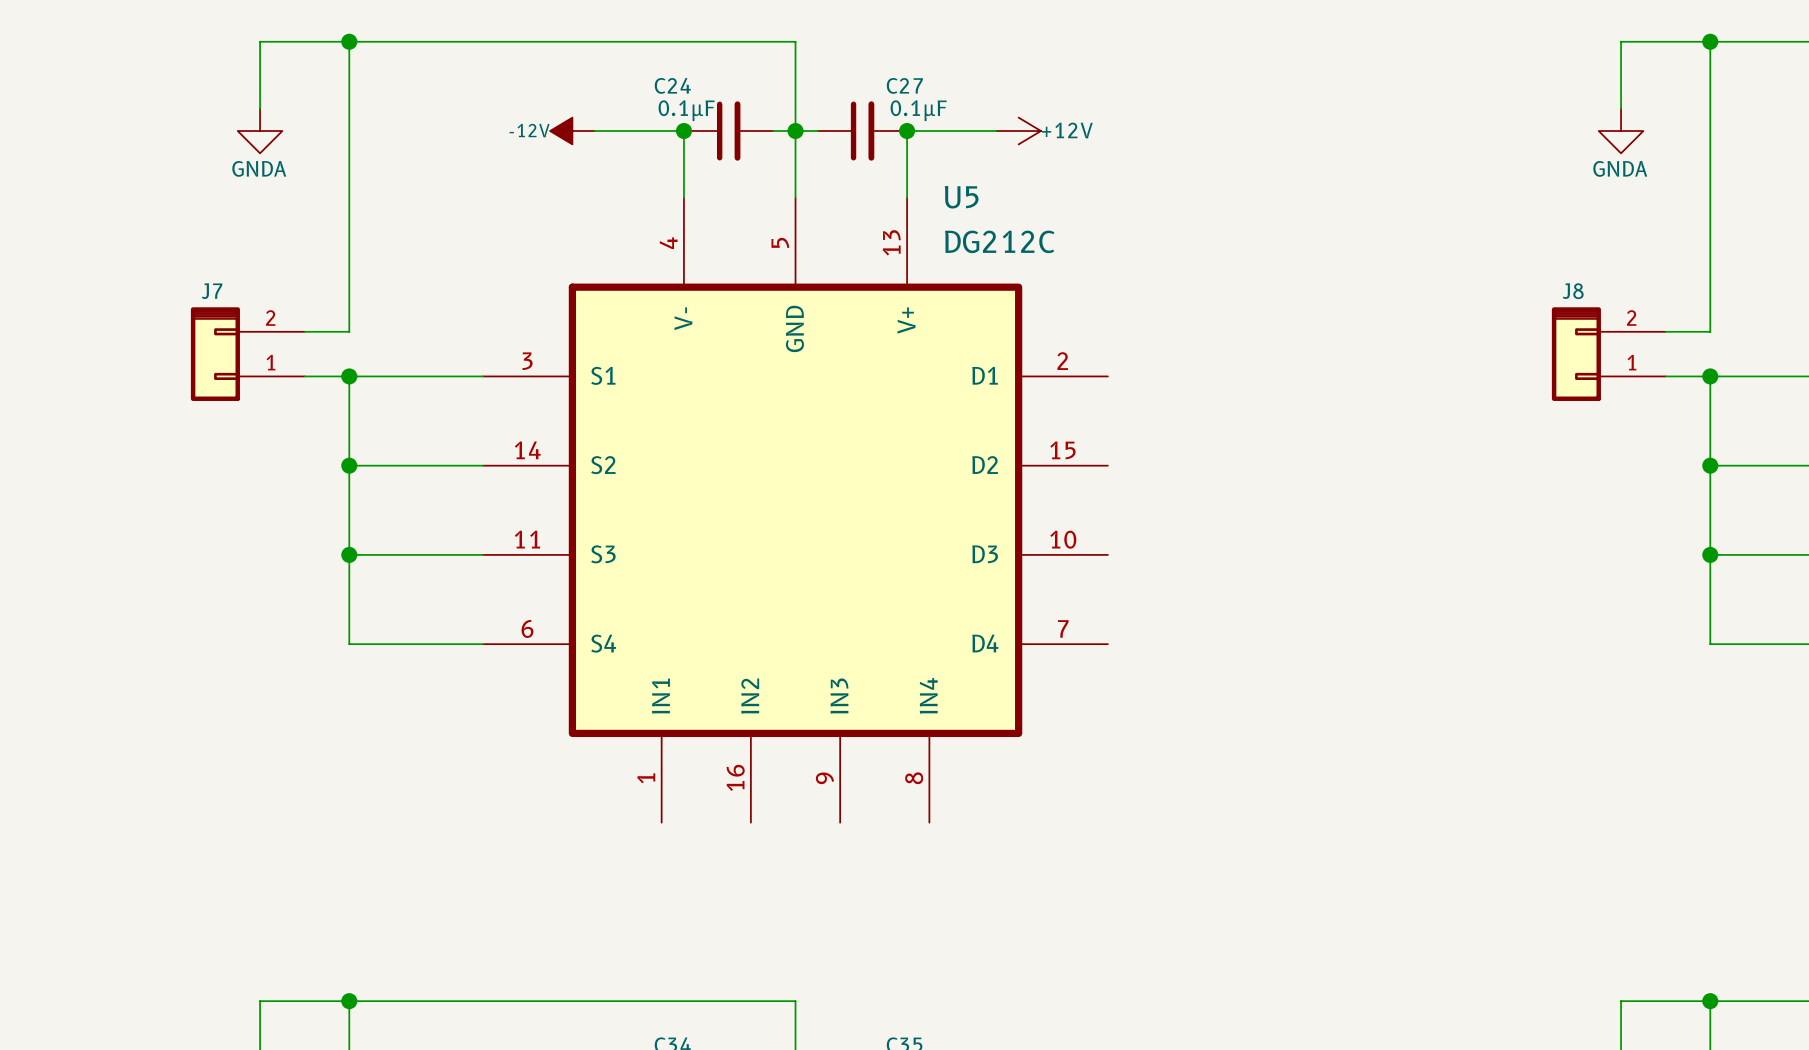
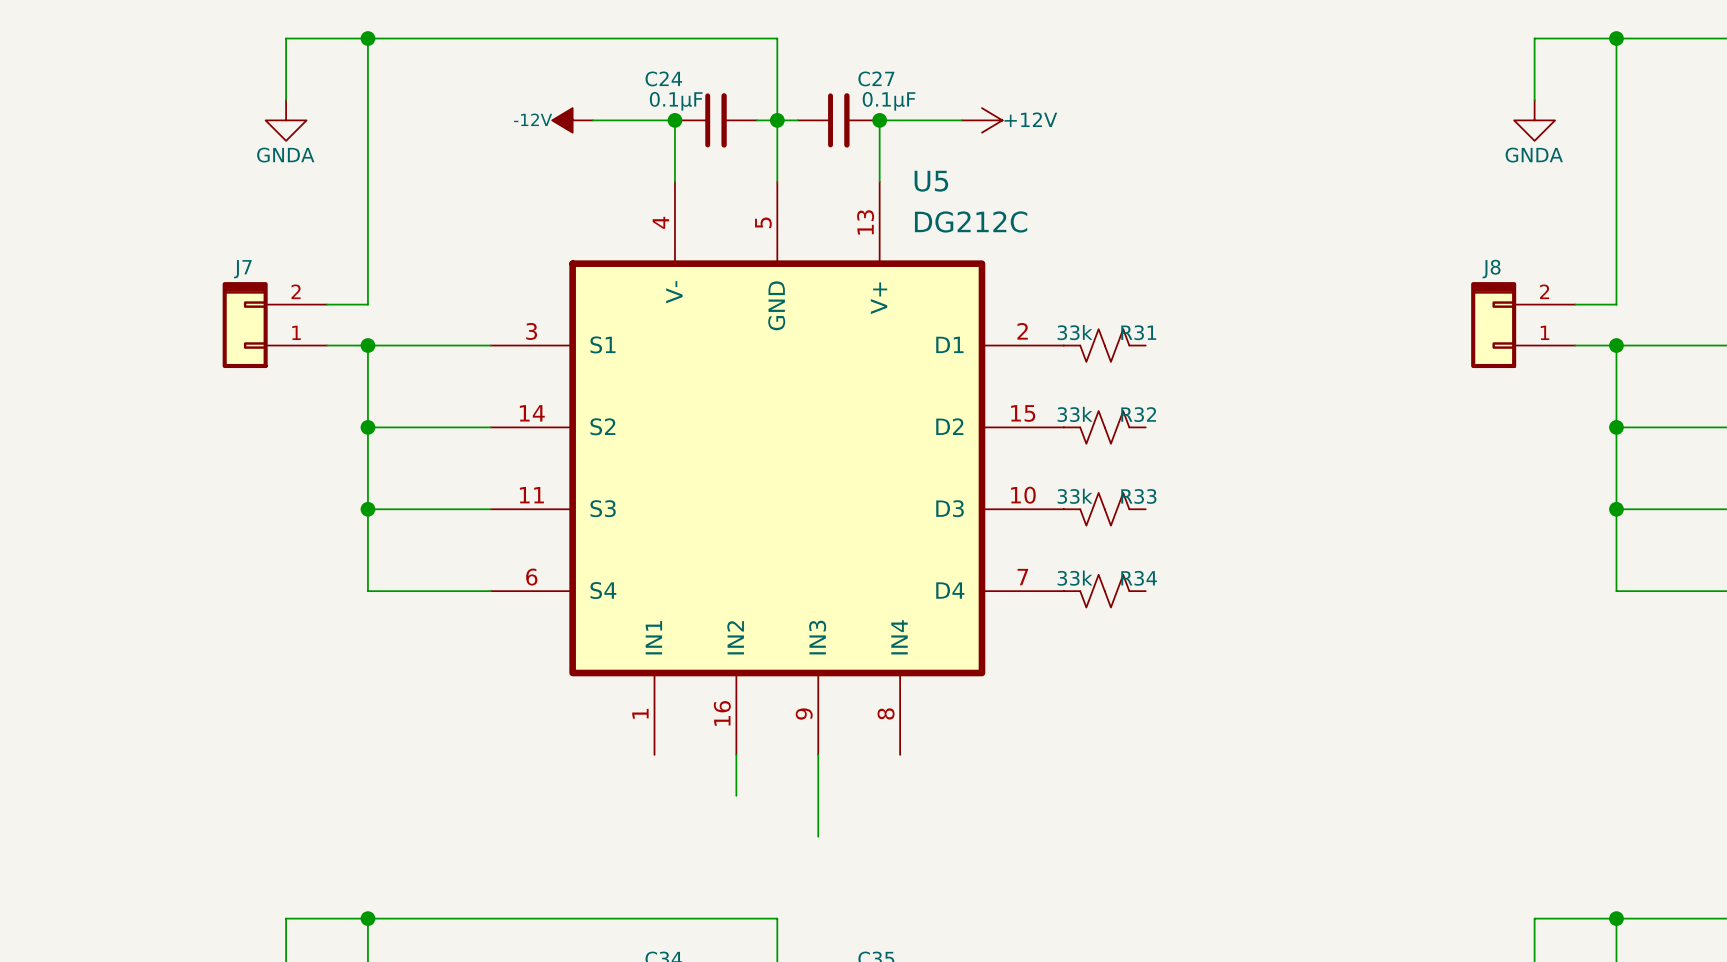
R31: none -> 33k (1104, 345)
R32: none -> 33k (1104, 427)
R33: none -> 33k (1104, 509)
R34: none -> 33k (1104, 591)
wire: none -> (736, 754) (736, 795)
wire: none -> (818, 754) (818, 836)

